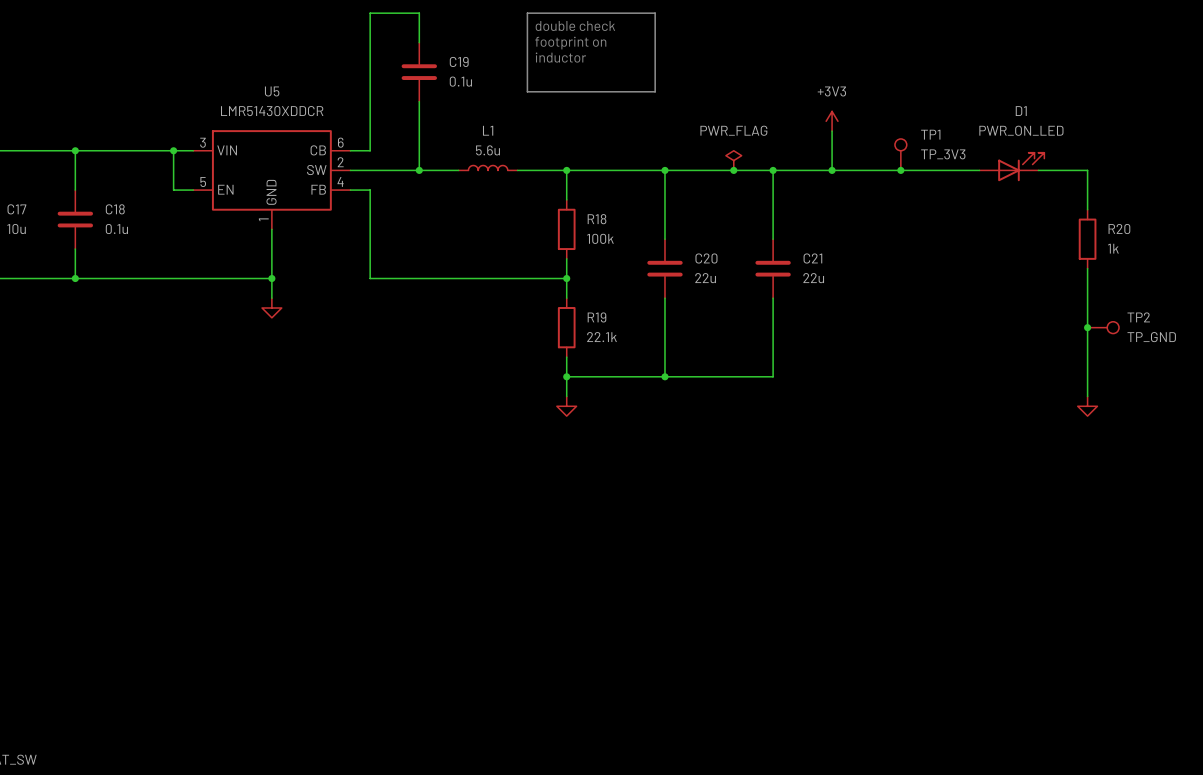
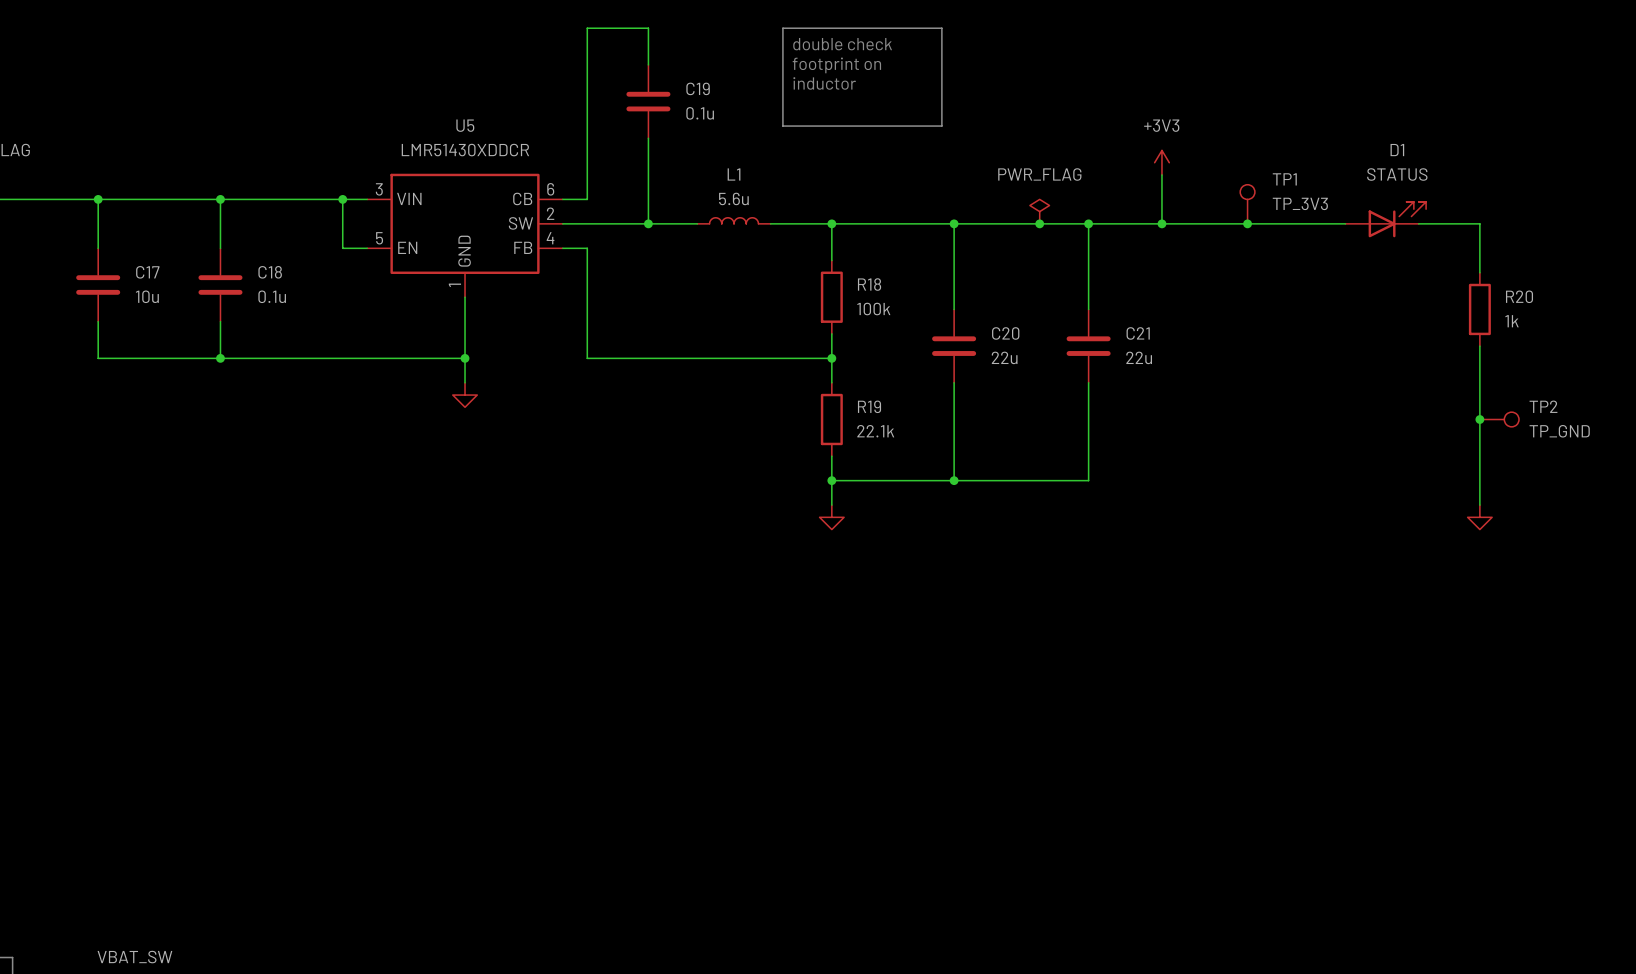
D1 value: PWR_ON_LED (1021, 130) -> STATUS (1397, 174)

